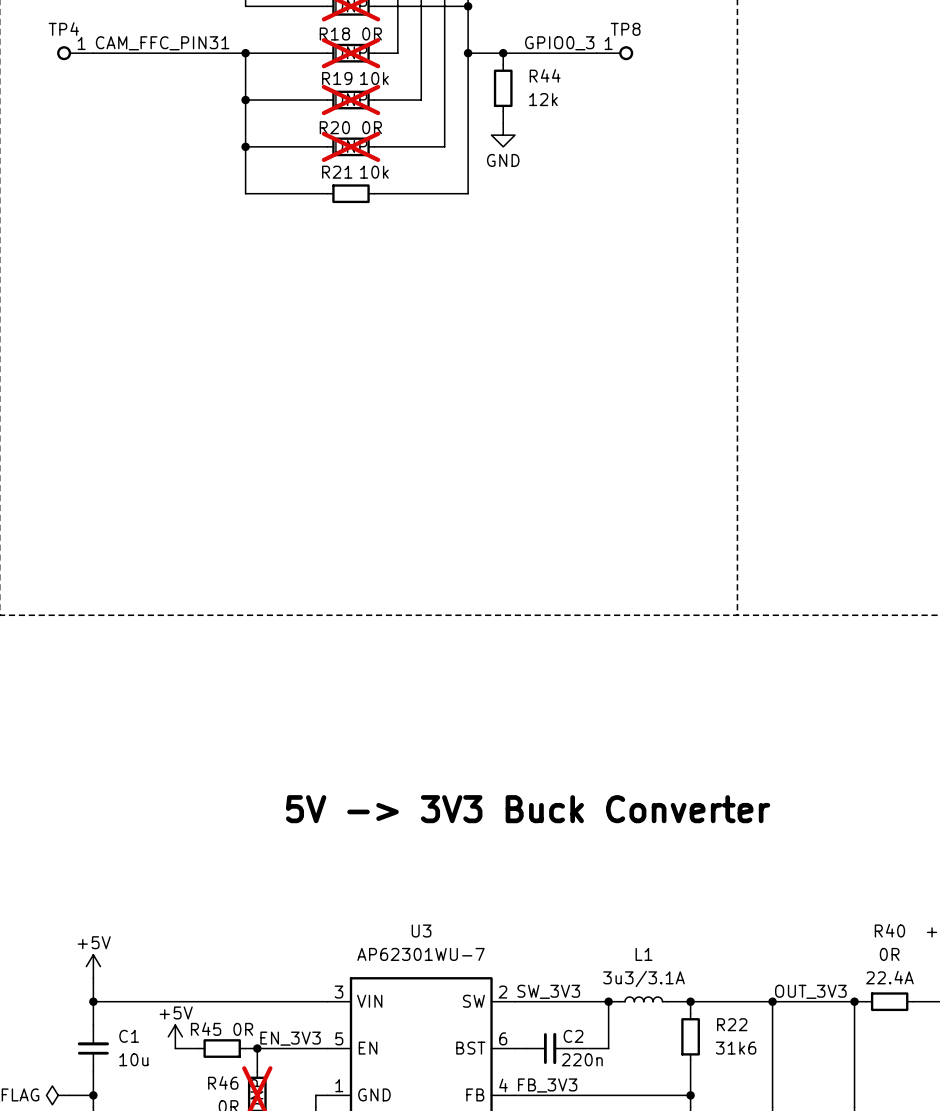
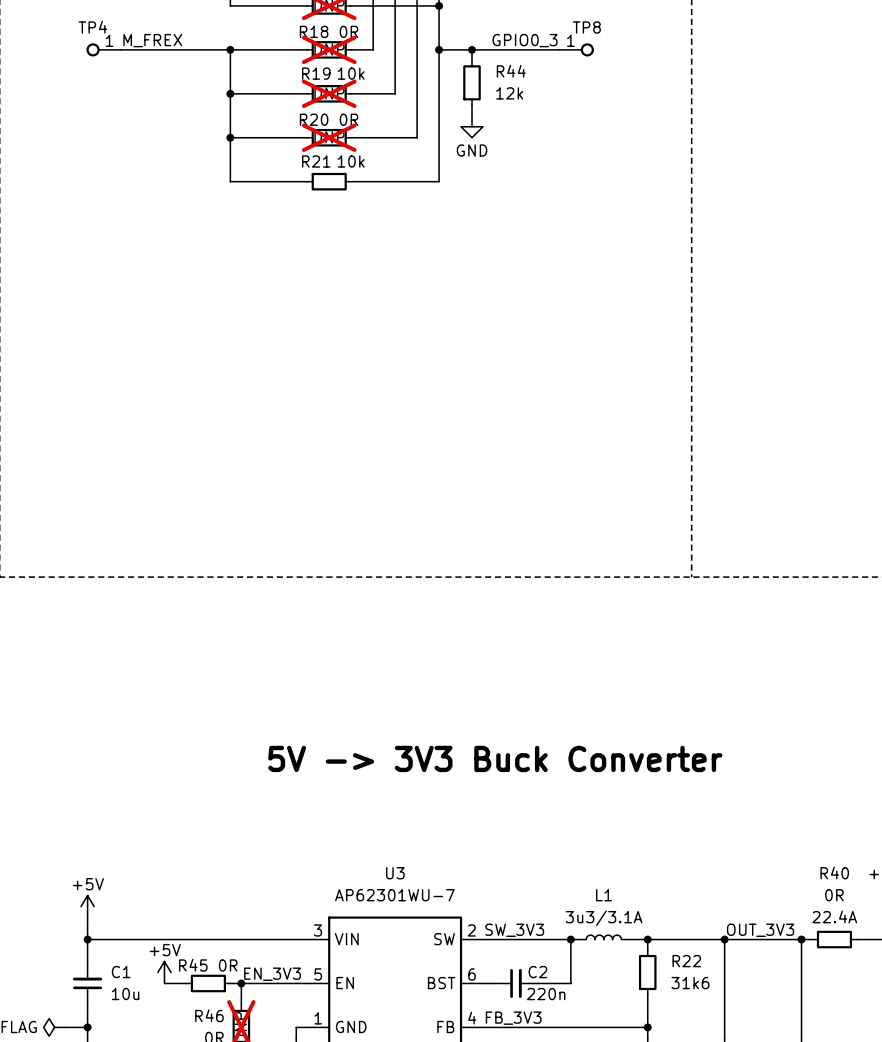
label: CAM_FFC_PIN31 (162, 43) -> none
label: none -> M_FREX (152, 40)
TP4 position: (75, 53) -> (103, 49)

